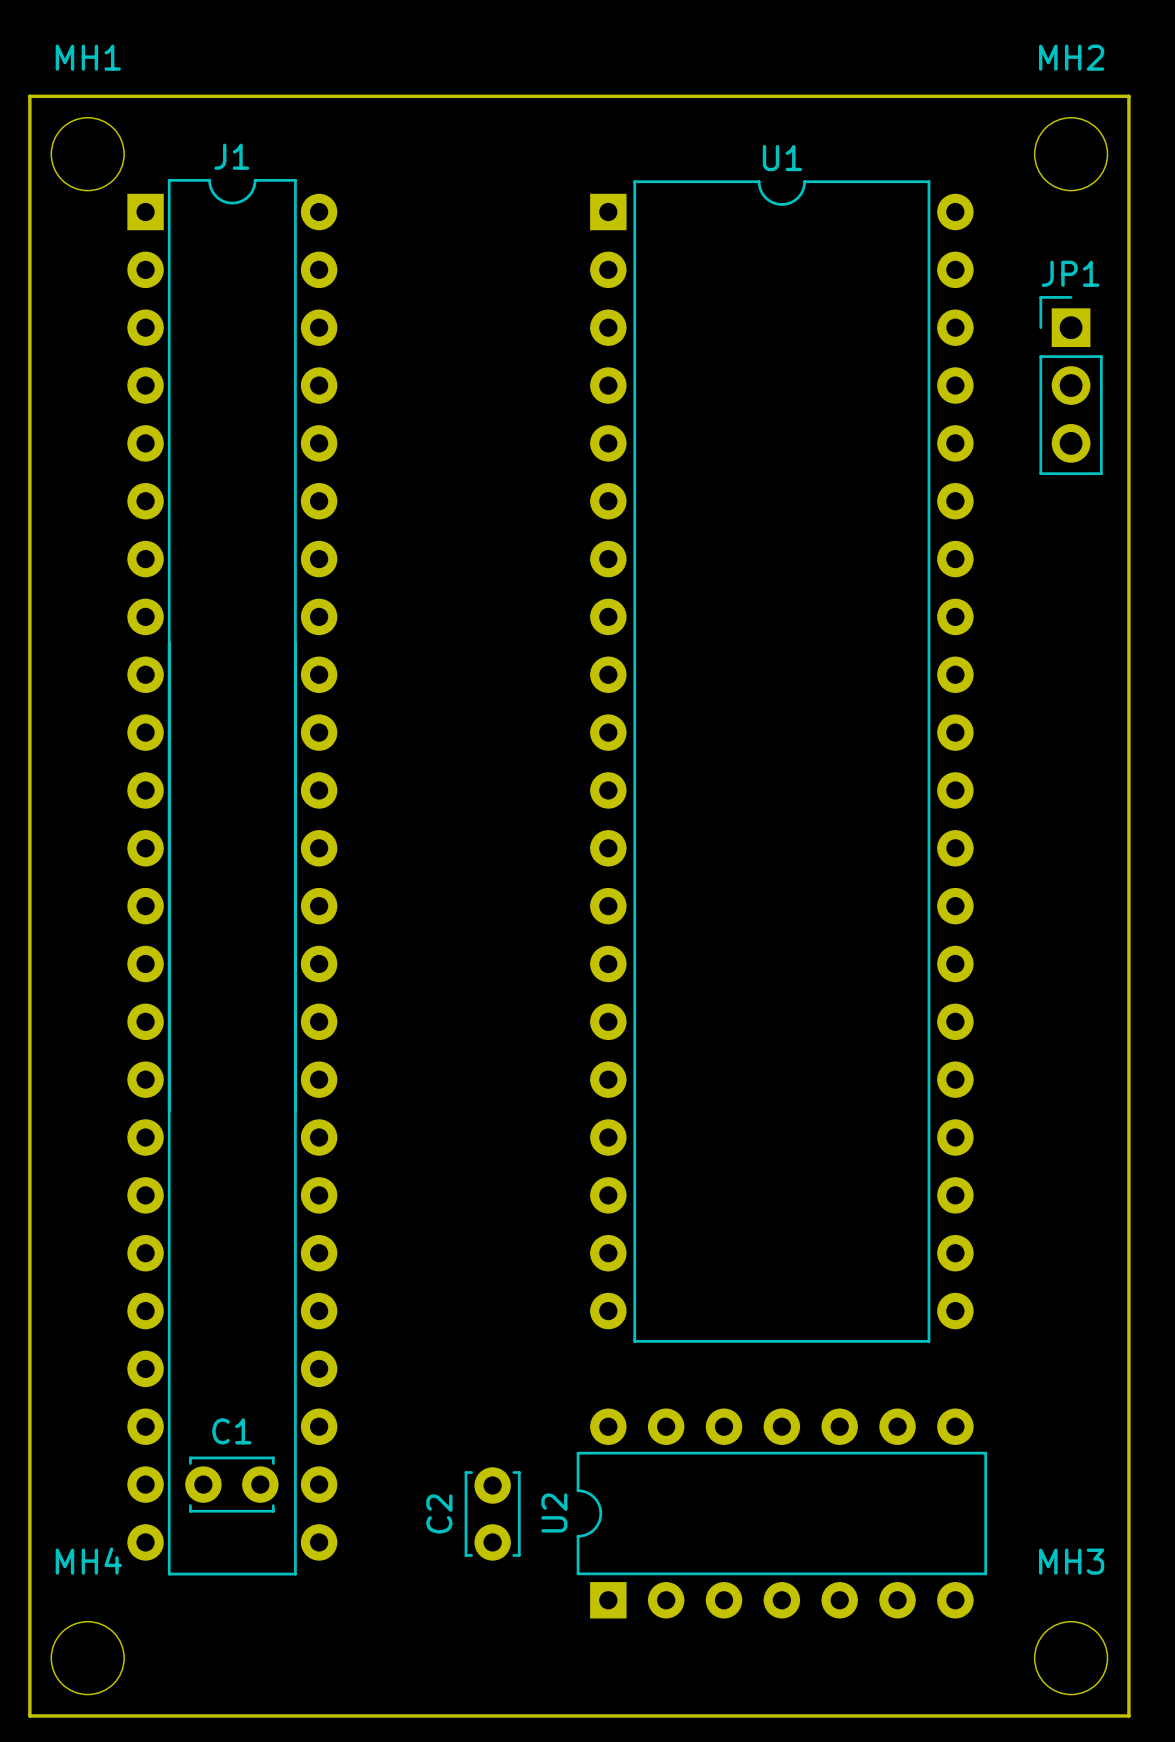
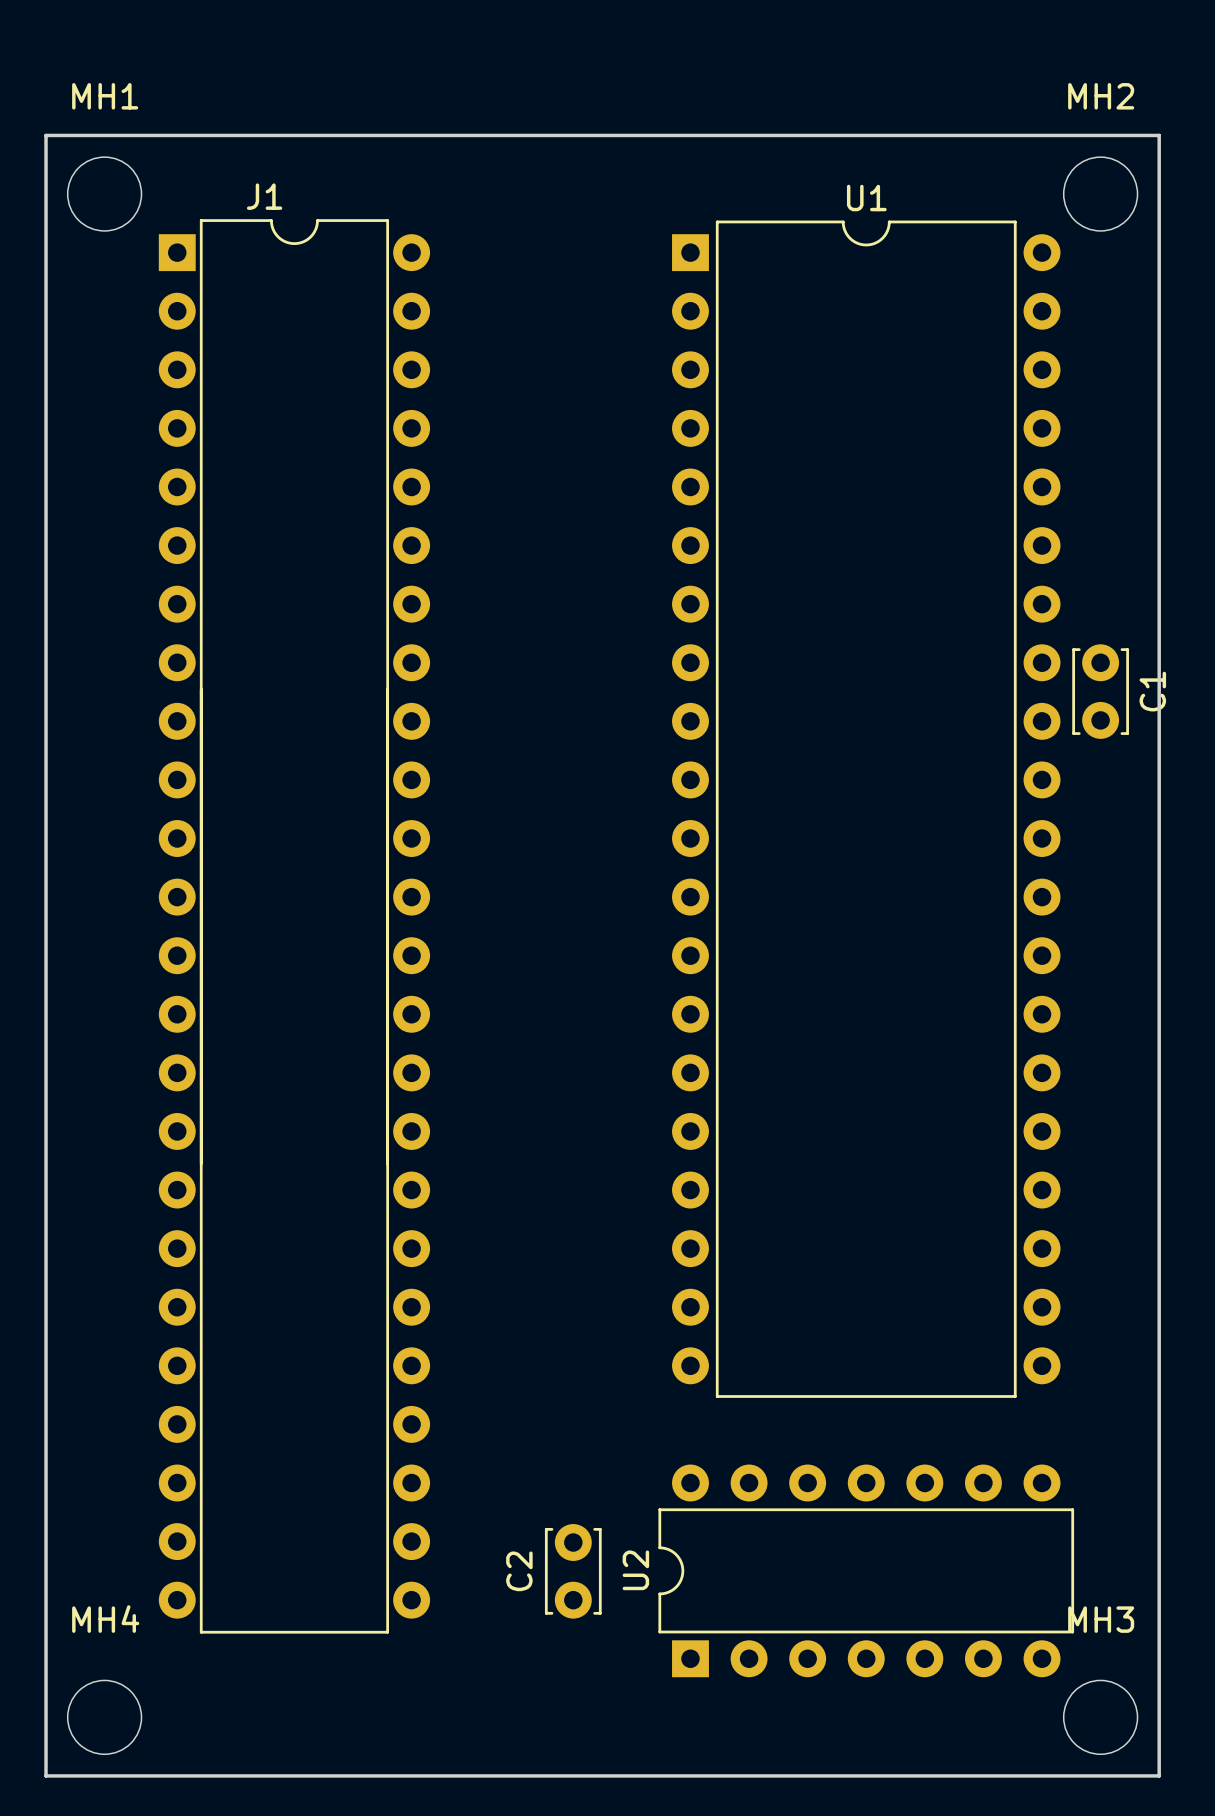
J1 footprint: [127, 178, 338, 1576] -> [158, 219, 431, 1634]
JP1: (1071, 385) -> none
U1 position: (781, 761) -> (866, 809)
C1 rotation: 0° (231, 1484) -> 90° clockwise (1100, 691)
C1 position: (231, 1484) -> (1100, 691)
C2 position: (492, 1513) -> (573, 1571)
U2 position: (781, 1513) -> (866, 1570)

